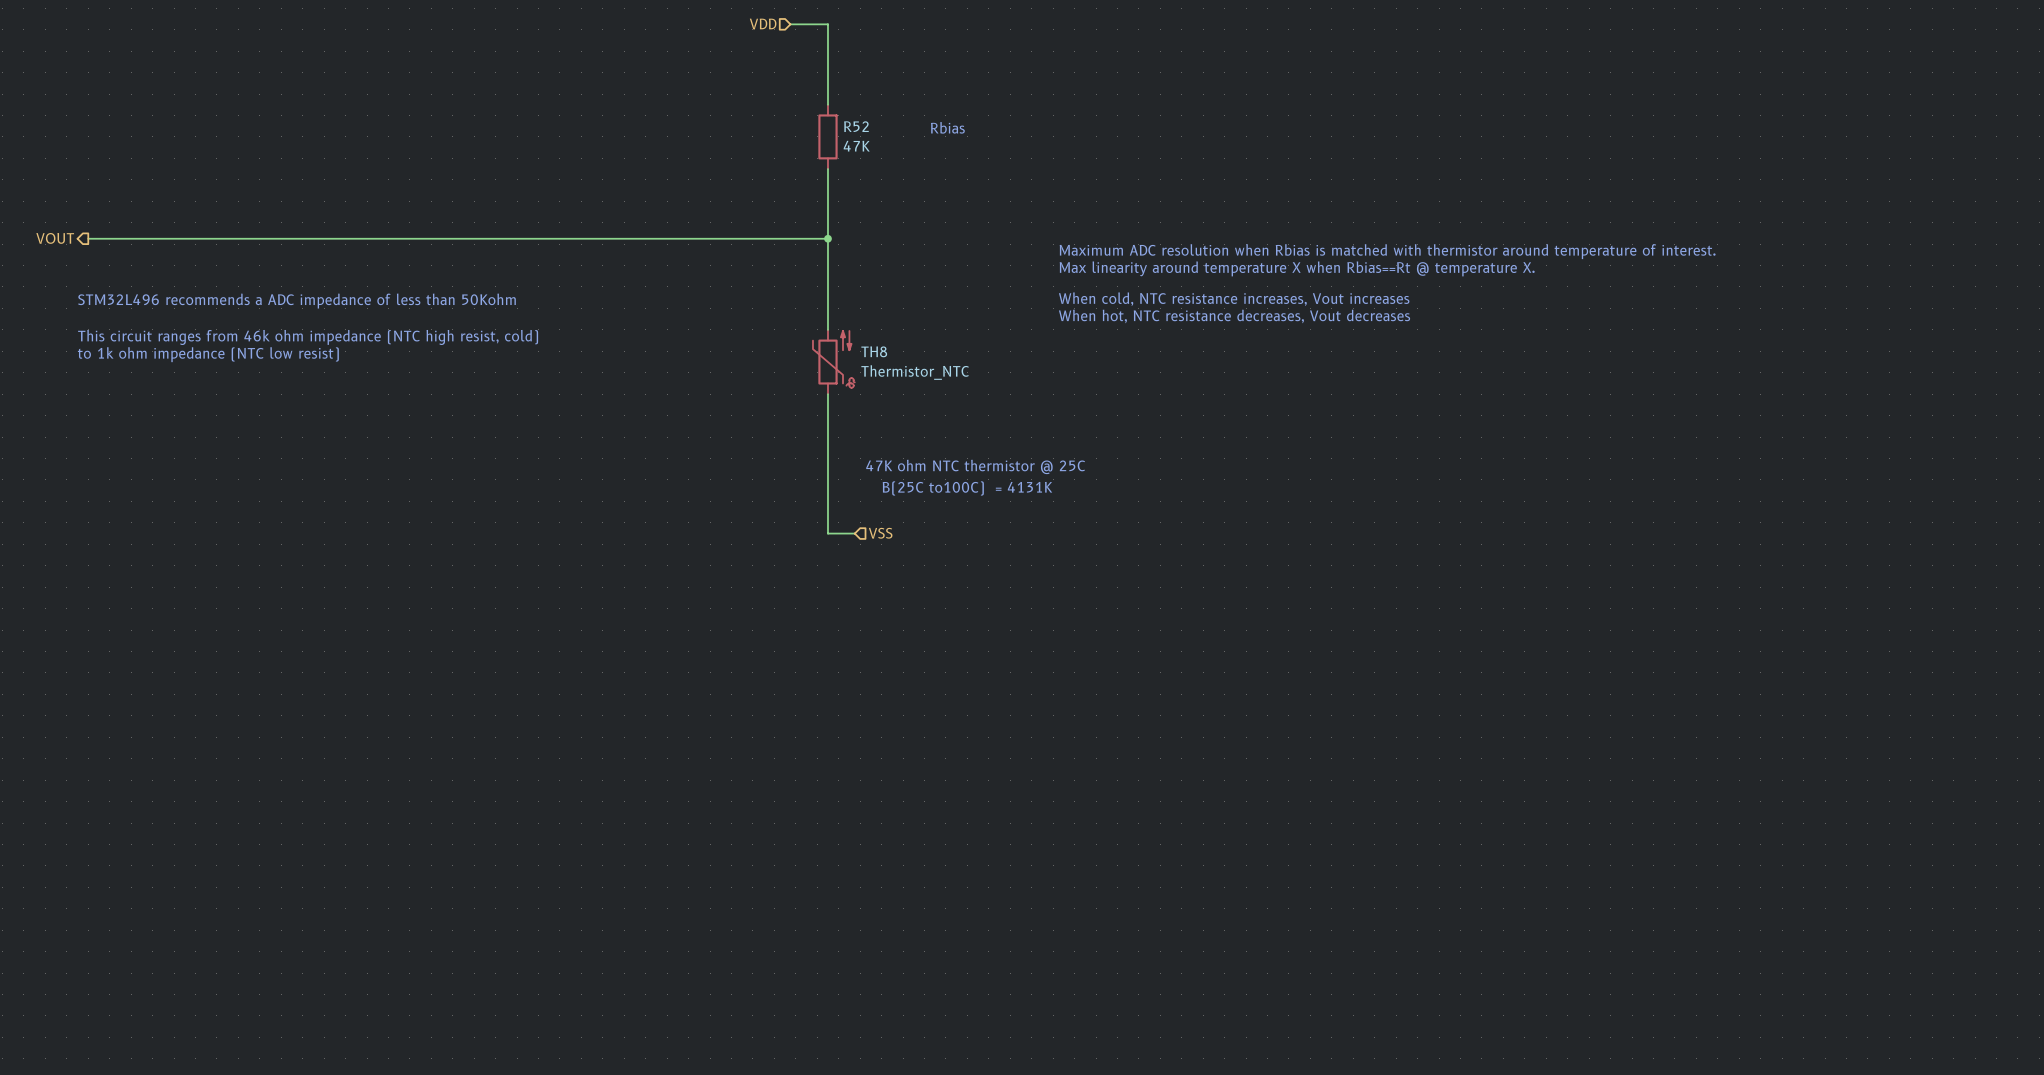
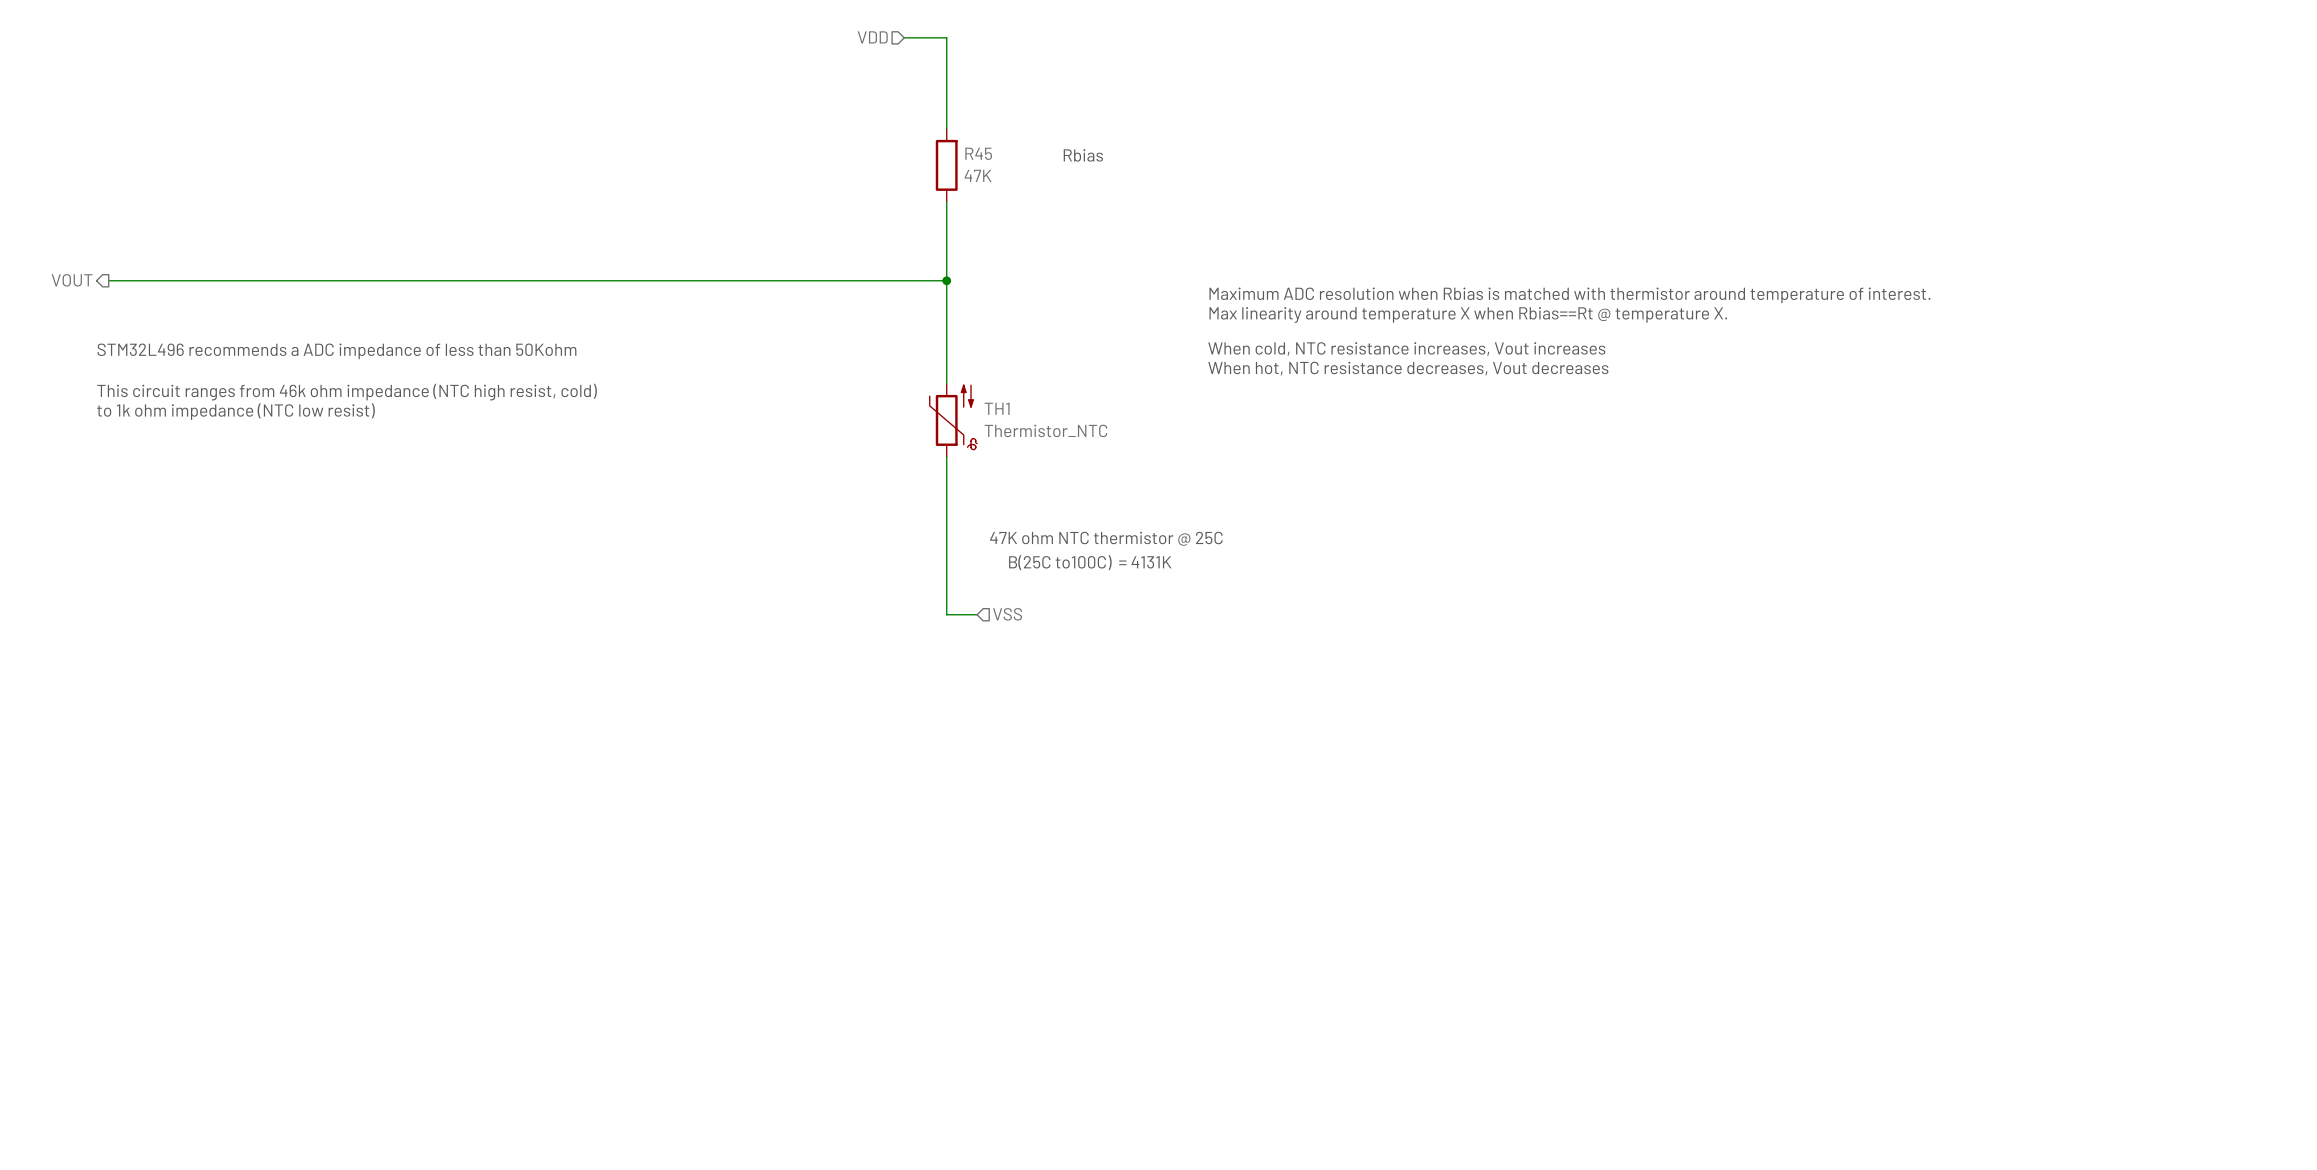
R52 name: R52 (856, 126) -> R45 (978, 153)
TH8 name: TH8 (874, 351) -> TH1 (997, 408)

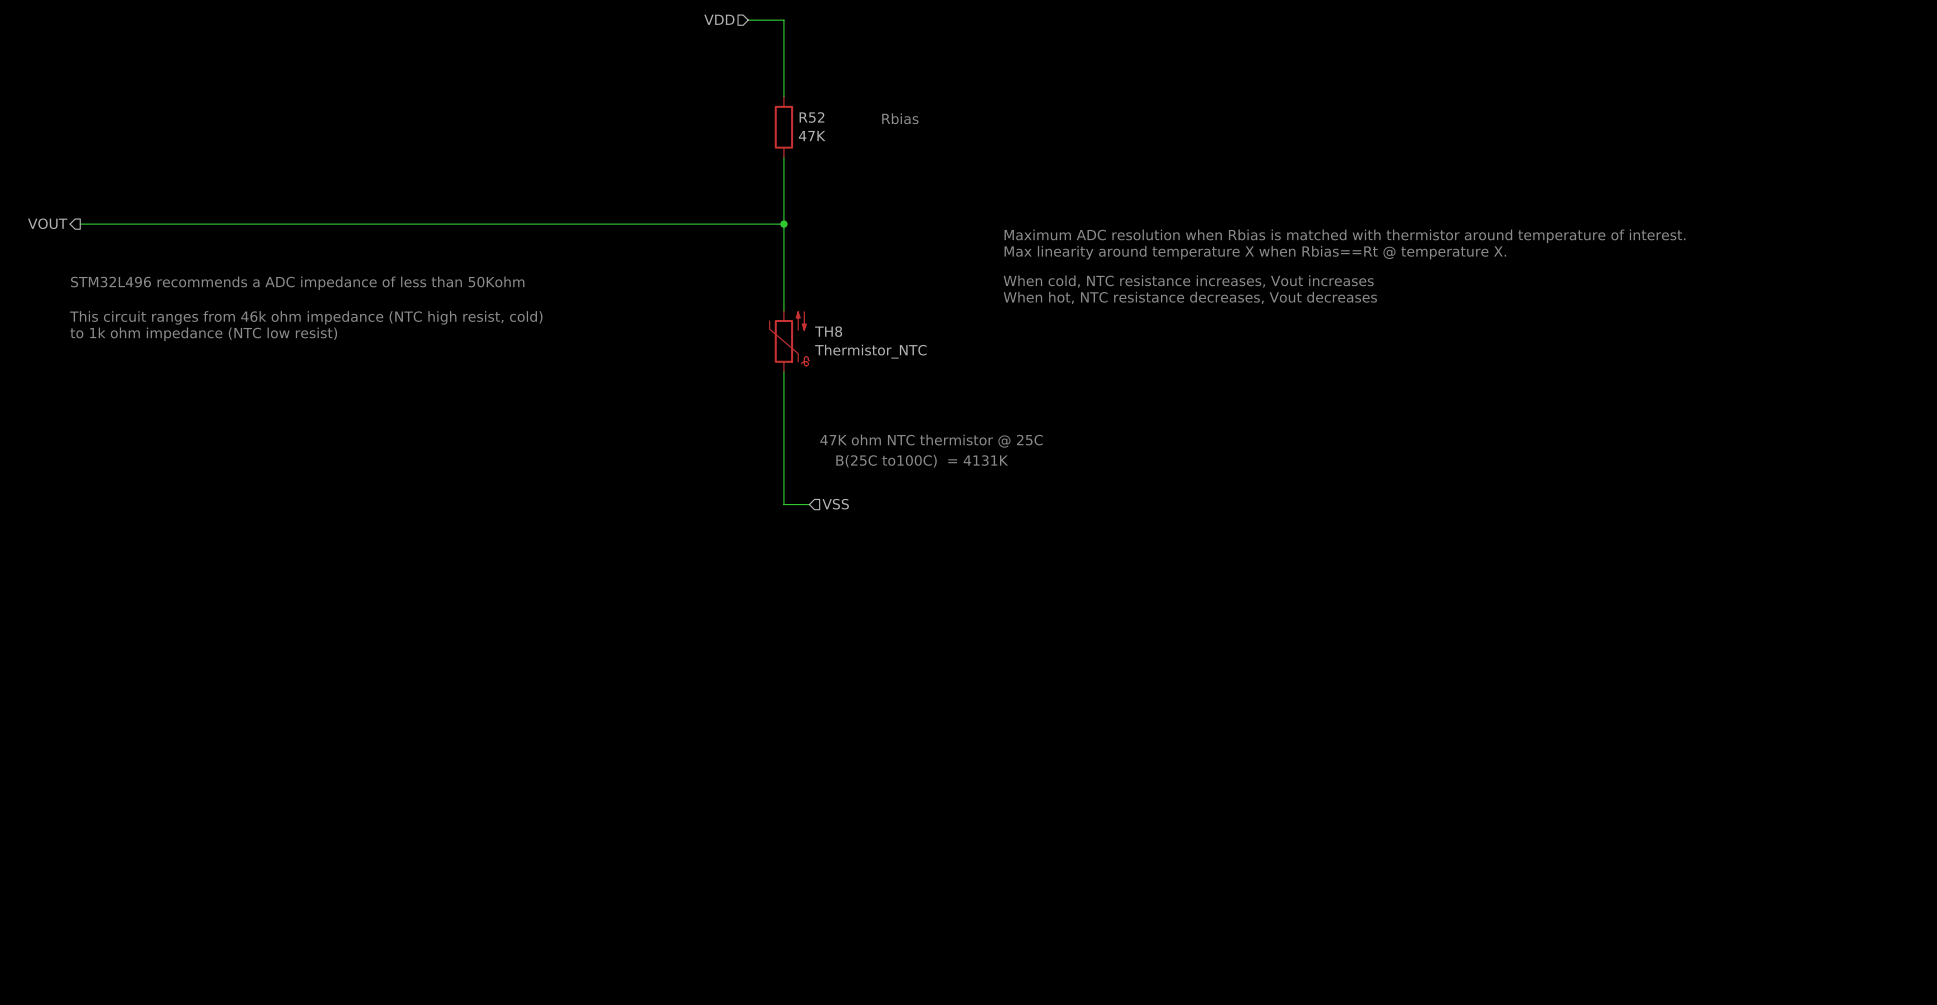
R45 name: R45 (978, 153) -> R52 (811, 117)
TH1 name: TH1 (997, 408) -> TH8 (828, 331)

